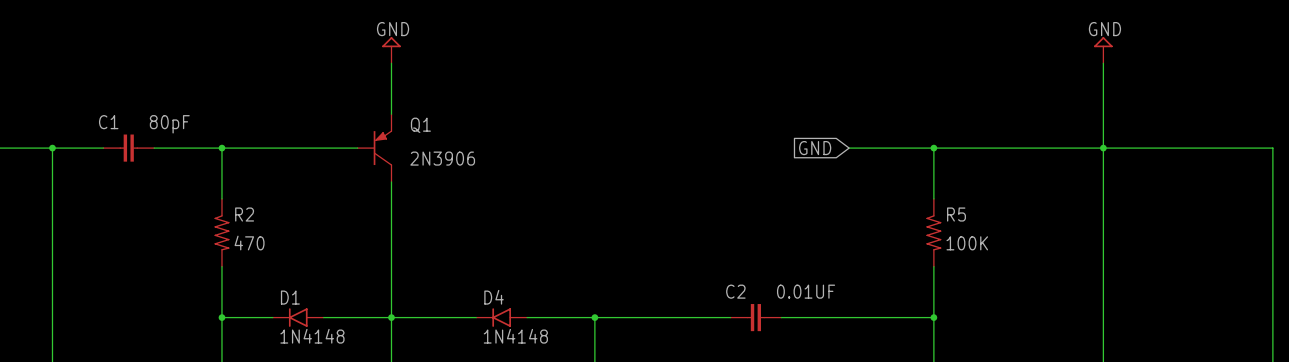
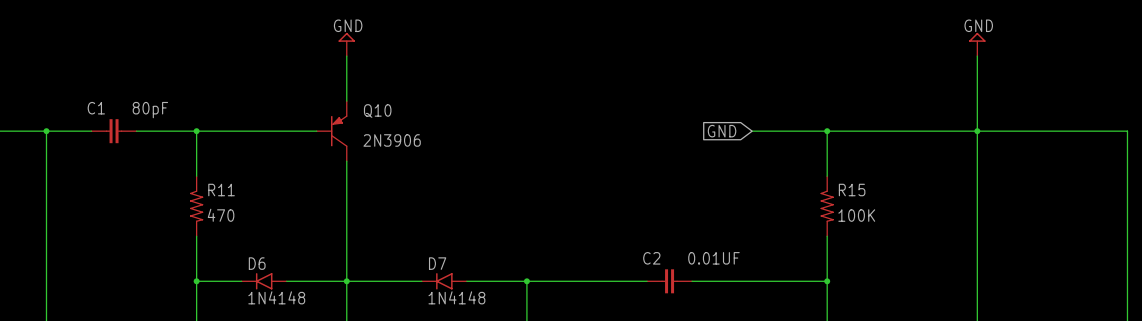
Q1 name: Q1 (420, 125) -> Q10 (377, 110)
R2 name: R2 (244, 214) -> R11 (221, 190)
R5 name: R5 (956, 214) -> R15 (852, 190)
D1 name: D1 (290, 297) -> D6 (257, 263)
D4 name: D4 (494, 297) -> D7 (437, 263)

